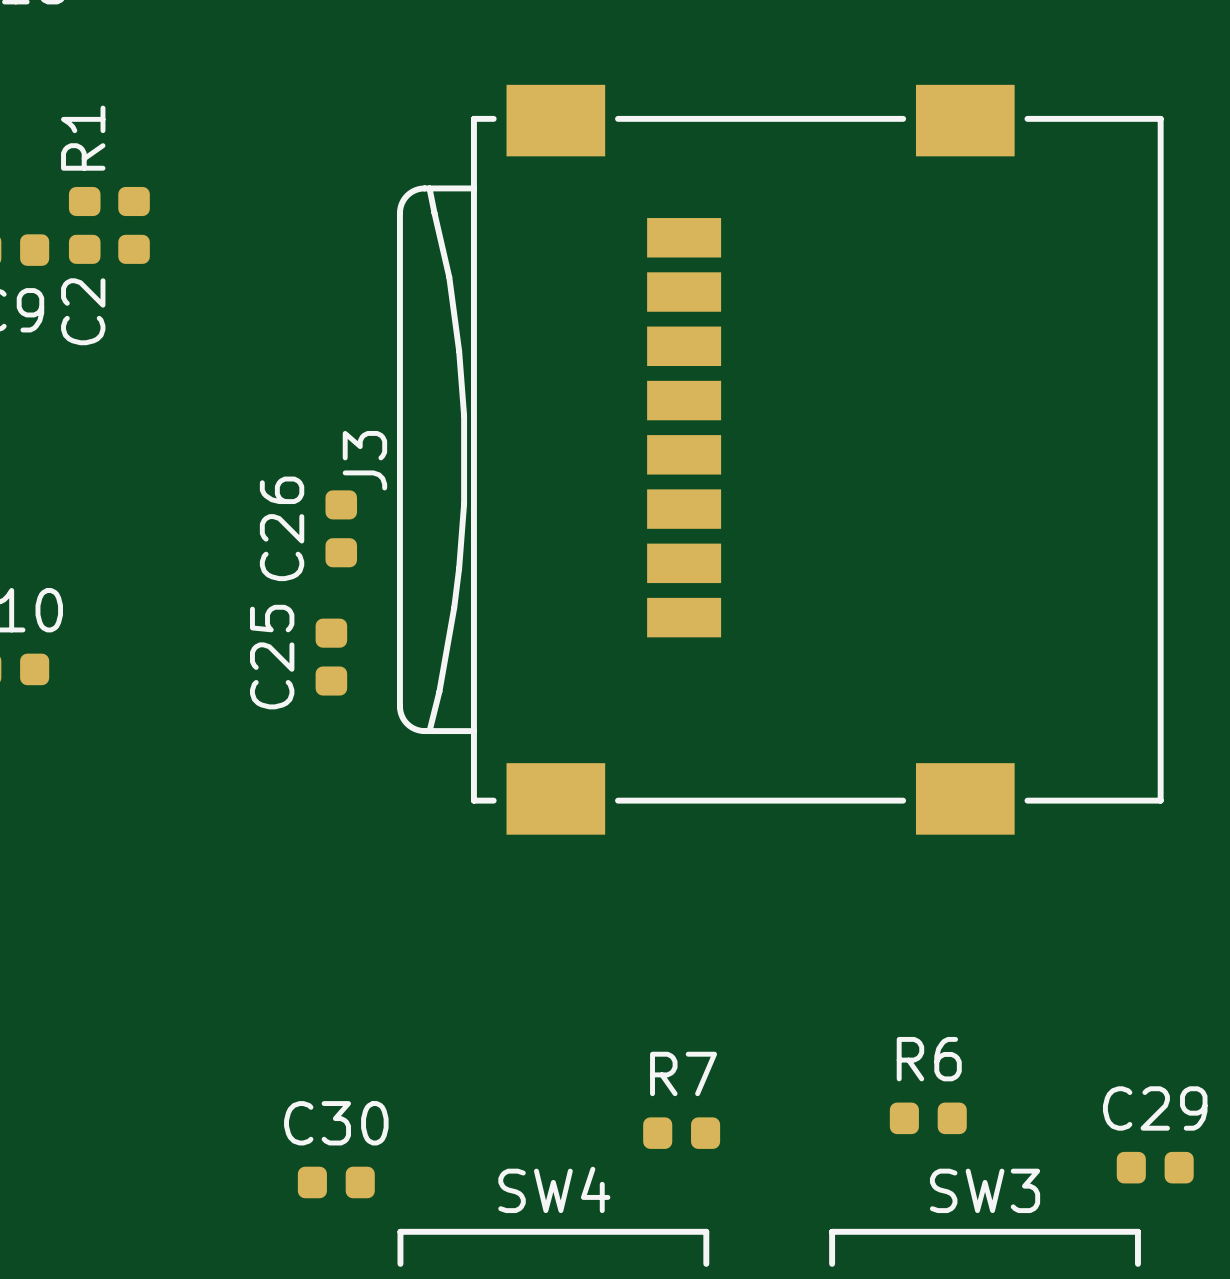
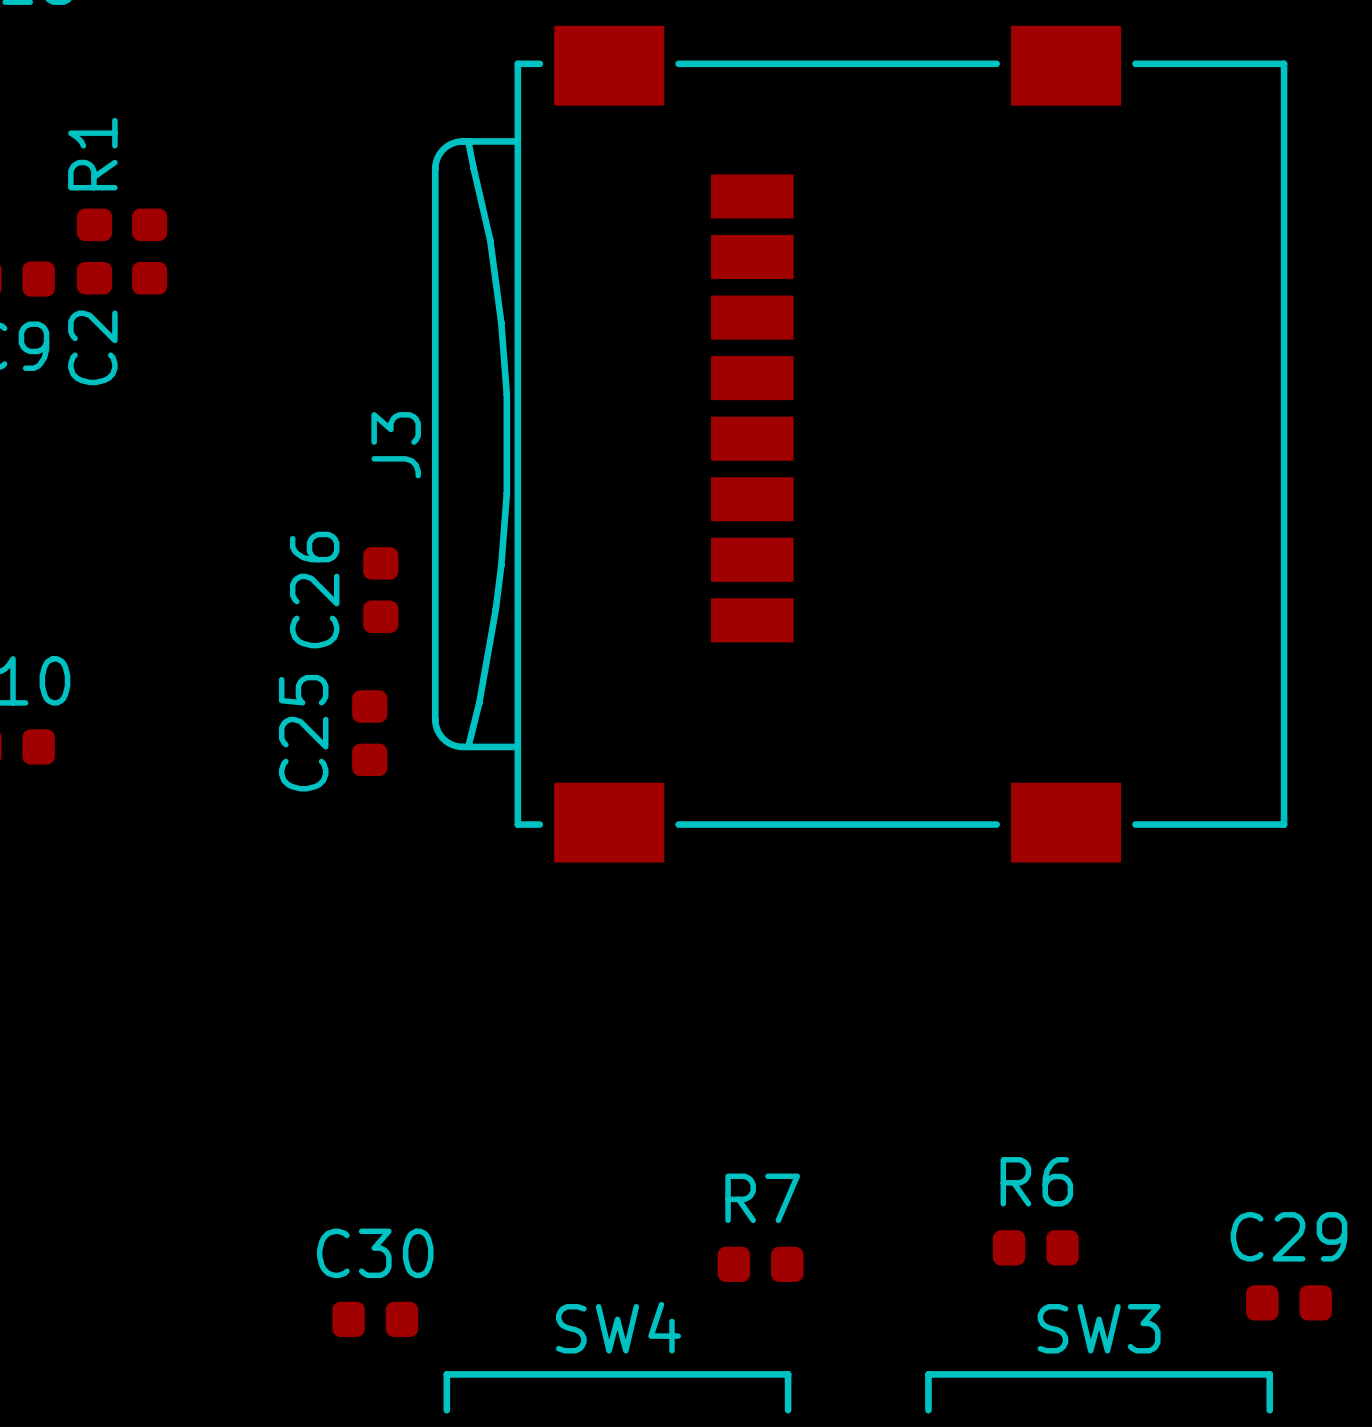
J3 position: (780, 459) -> (859, 444)

